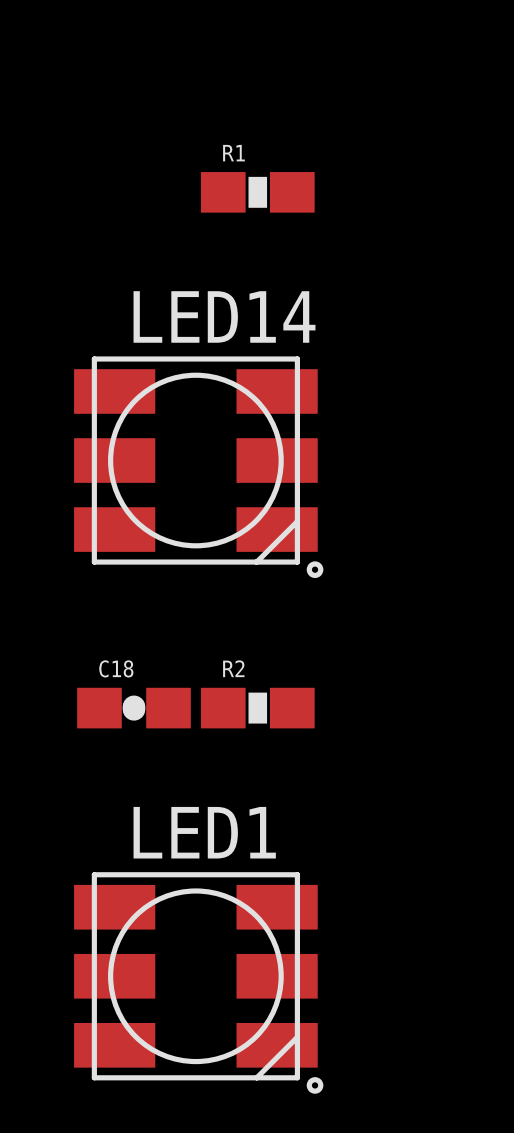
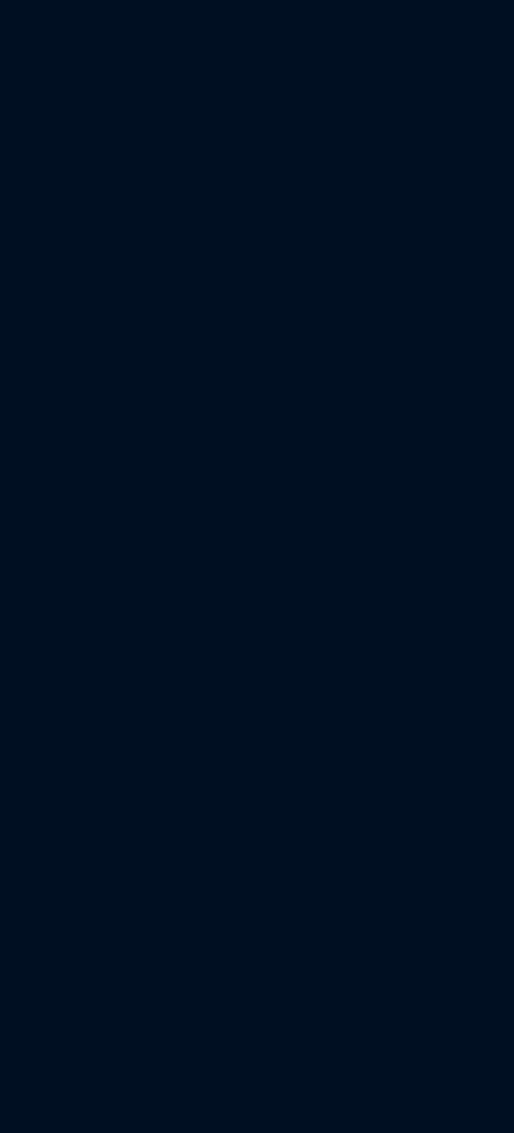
R1: (257, 192) -> none
LED14: (198, 467) -> none
C18: (134, 708) -> none
R2: (257, 708) -> none
LED1: (198, 982) -> none

